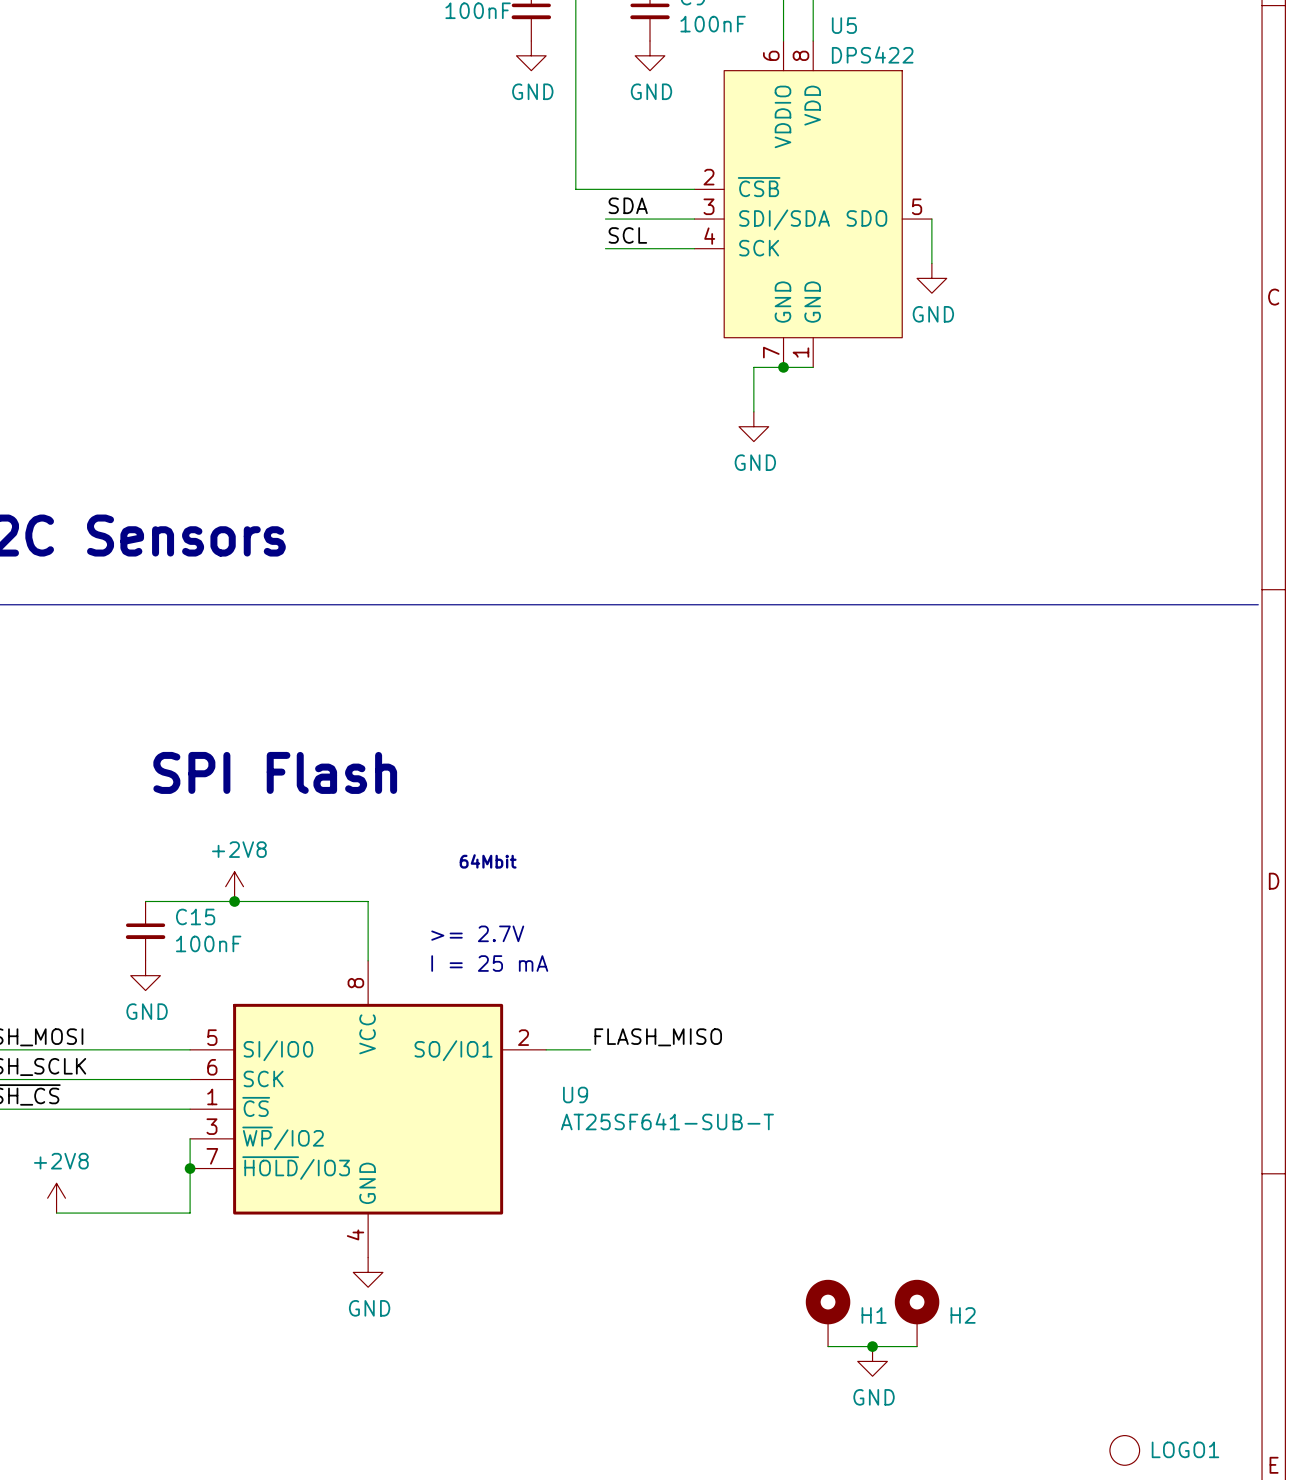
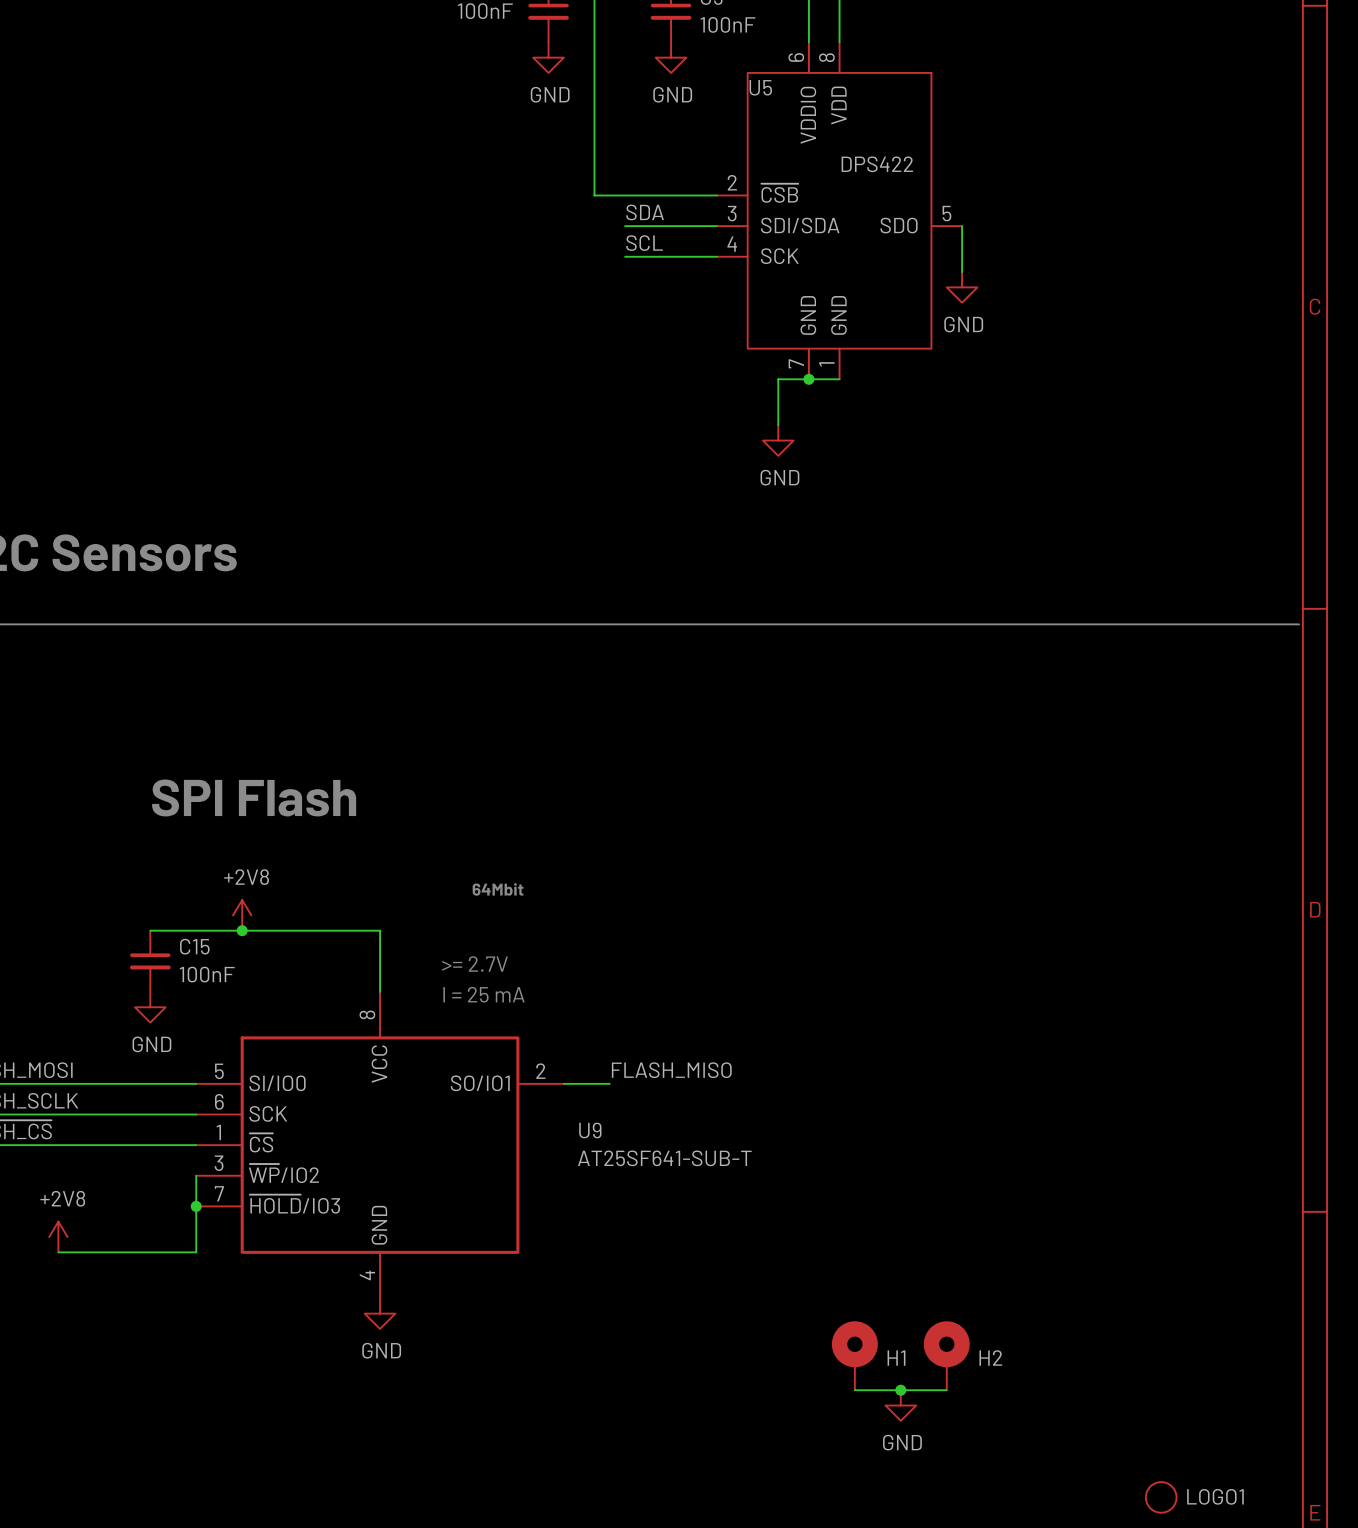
U5 name position: U5 (844, 25) -> U5 (760, 87)
U5 value position: DPS422 (872, 54) -> DPS422 (877, 164)

